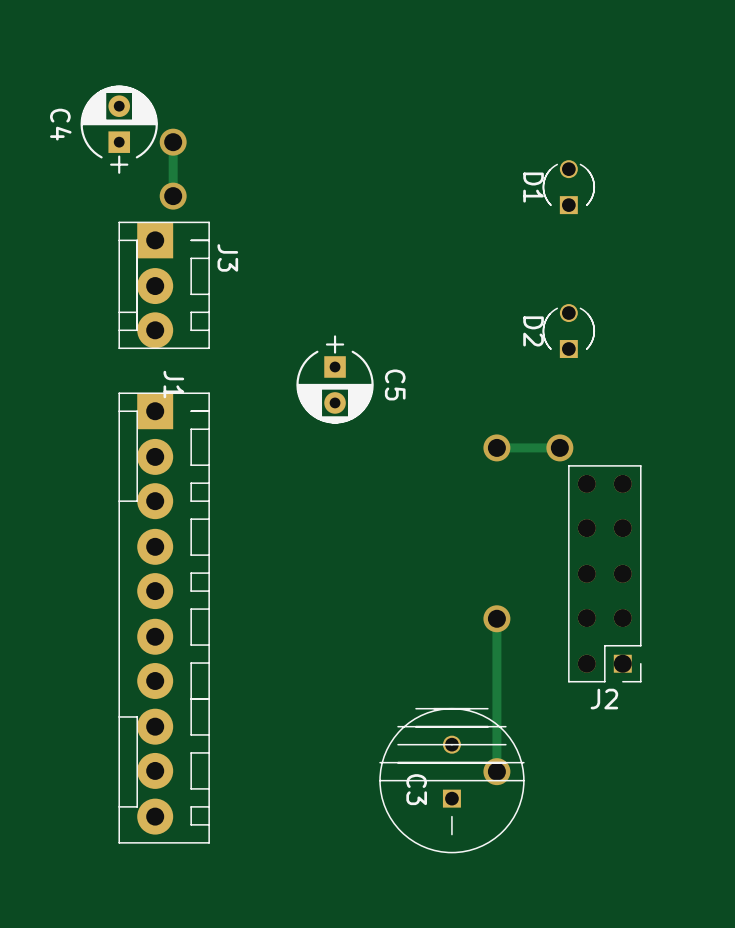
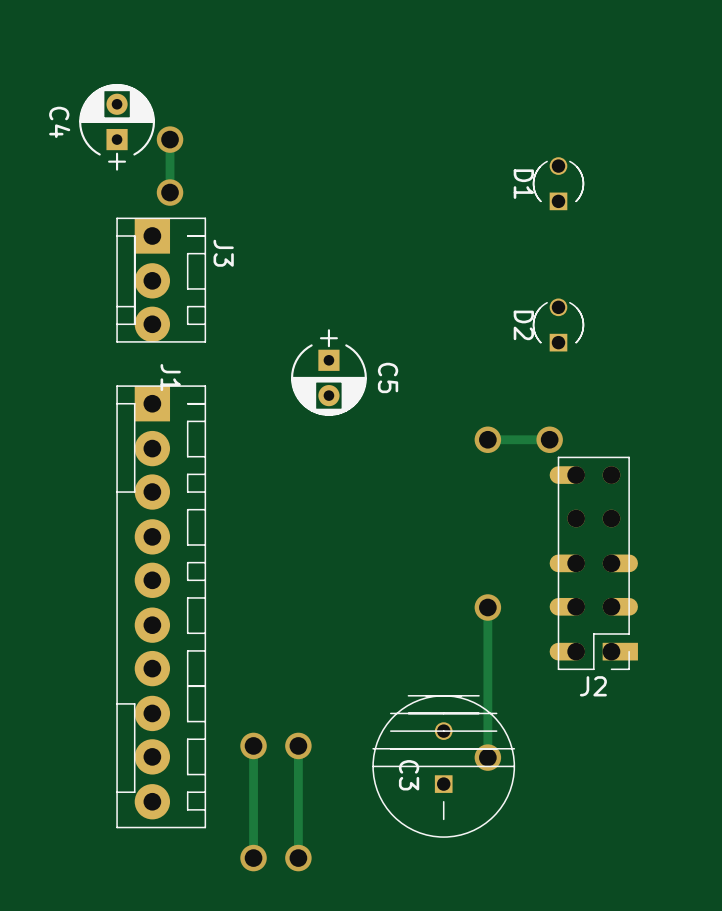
J2 footprint: [568, 465, 641, 682] -> [549, 457, 638, 670]
track: none -> (253, 745) (253, 858)
via: none -> (253, 745)
track: none -> (298, 745) (298, 858)
via: none -> (298, 745)
via: none -> (253, 858)
via: none -> (298, 858)

